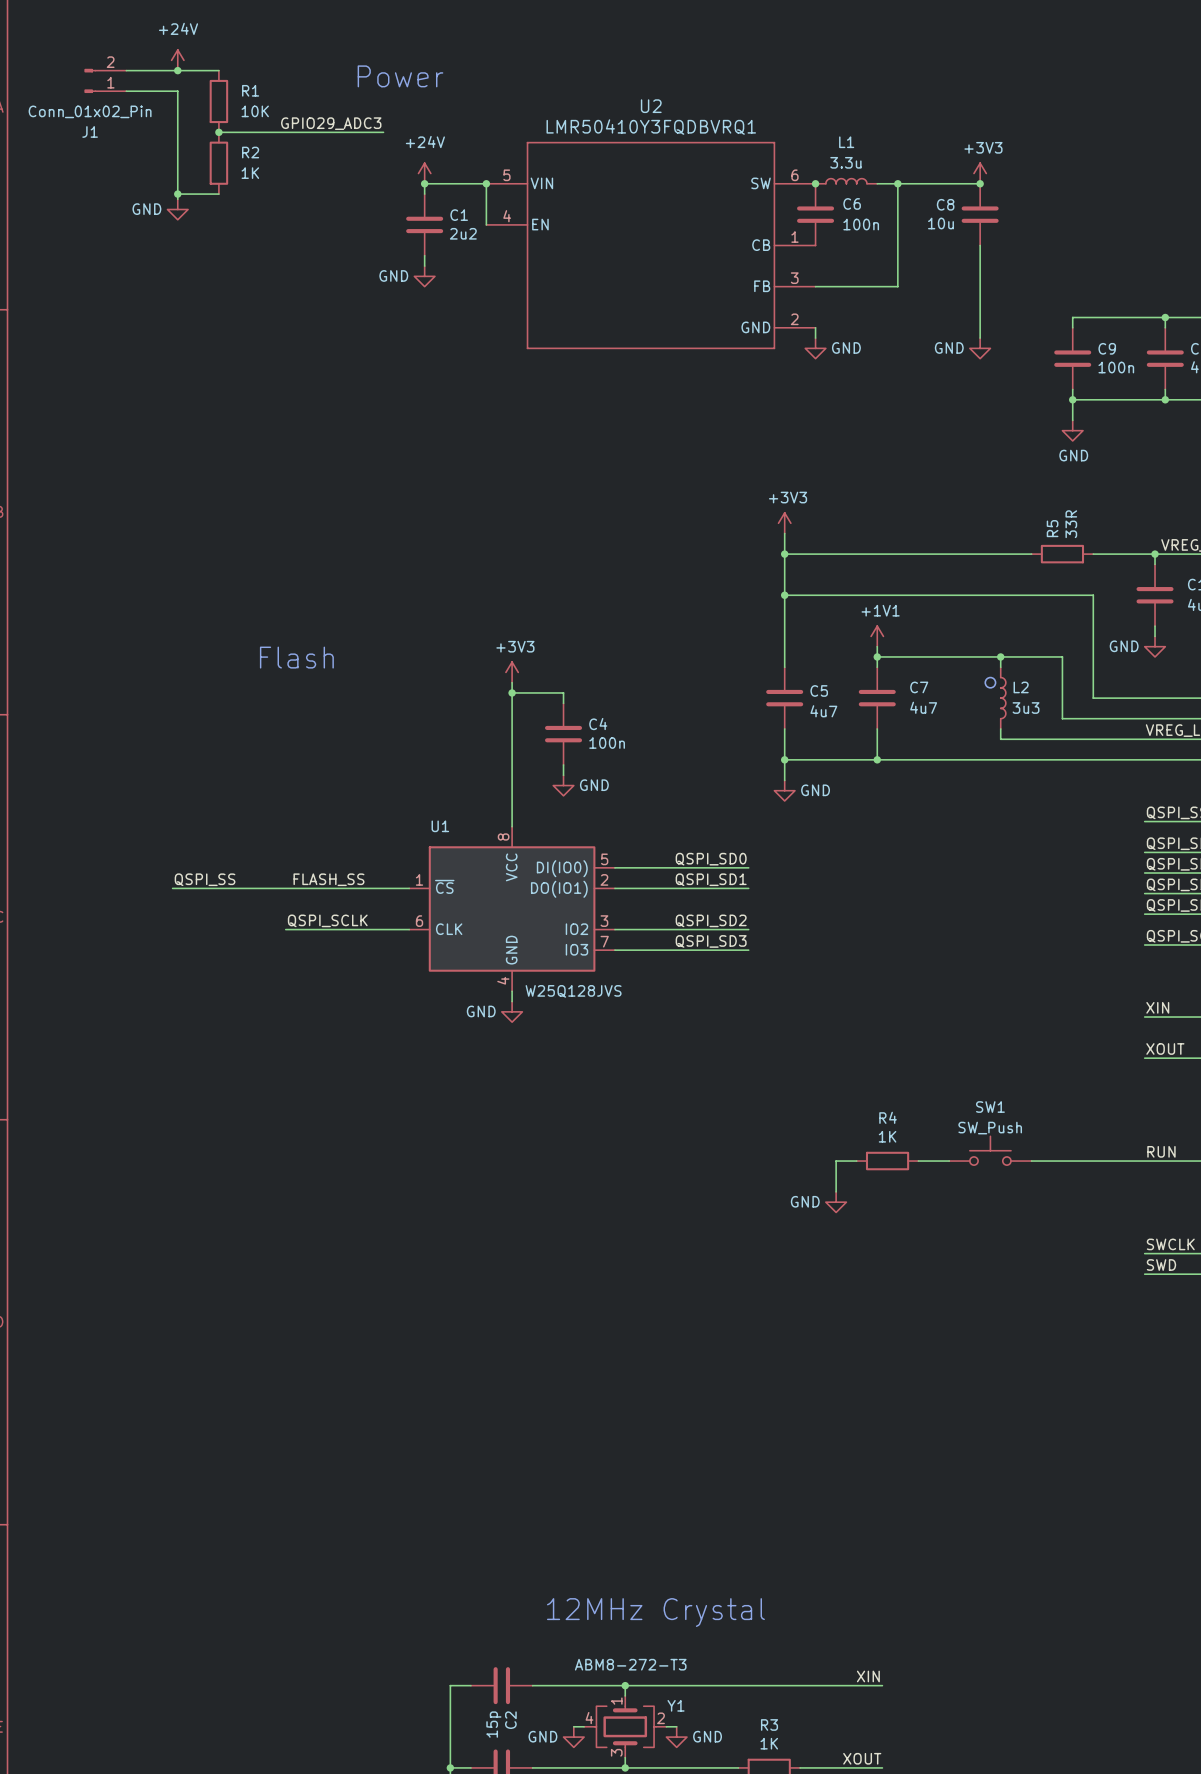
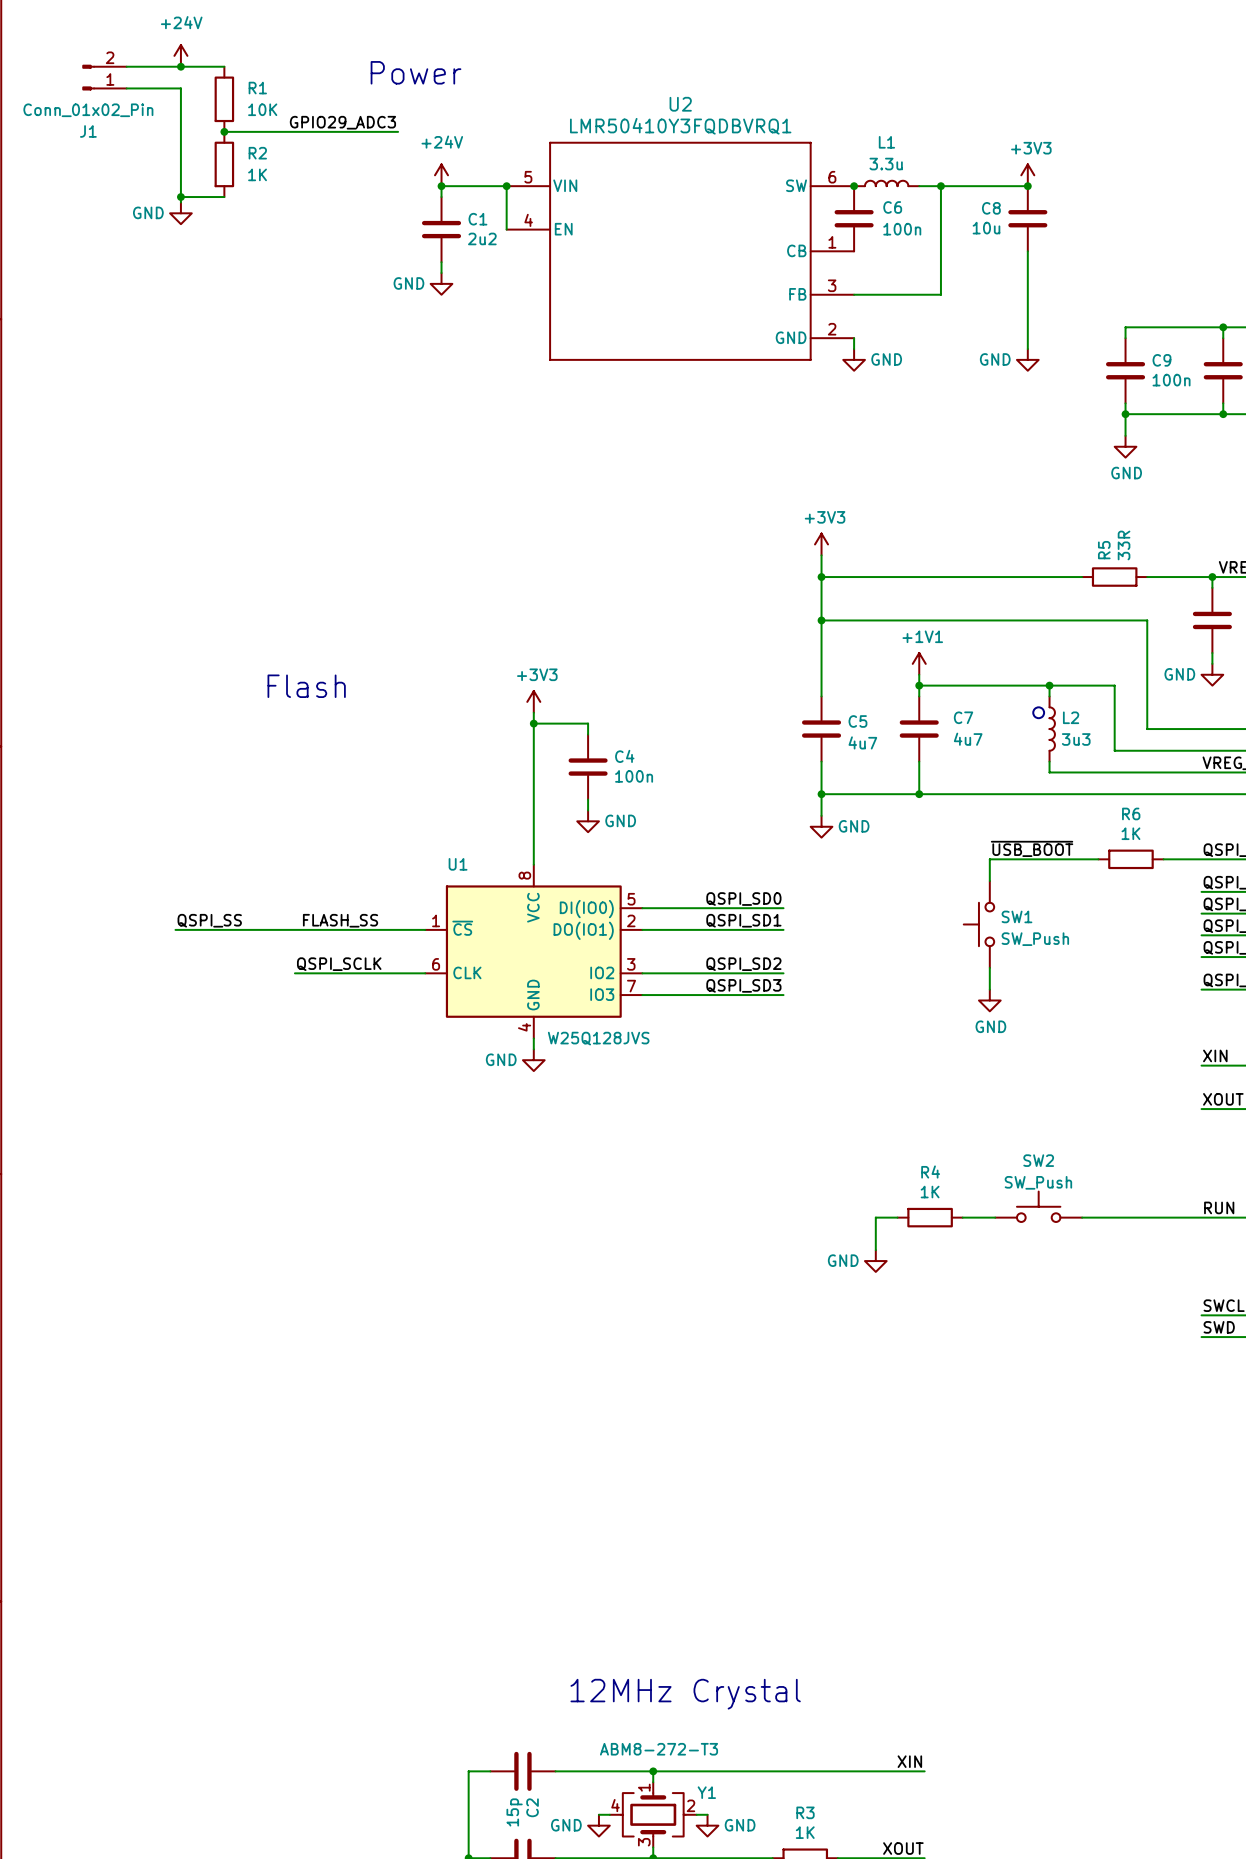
label: none -> ~{USB_BOOT} (1032, 848)
wire: none -> (1098, 859) (989, 859) (989, 881)
R6: none -> 1K (1130, 859)
wire: none -> (1163, 859) (1201, 859)
SW1: none -> SW_Push (978, 924)
wire: none -> (989, 967) (989, 989)
power symbol: none -> GND (989, 1000)
SW1 name: SW1 (990, 1107) -> SW2 (1038, 1160)

